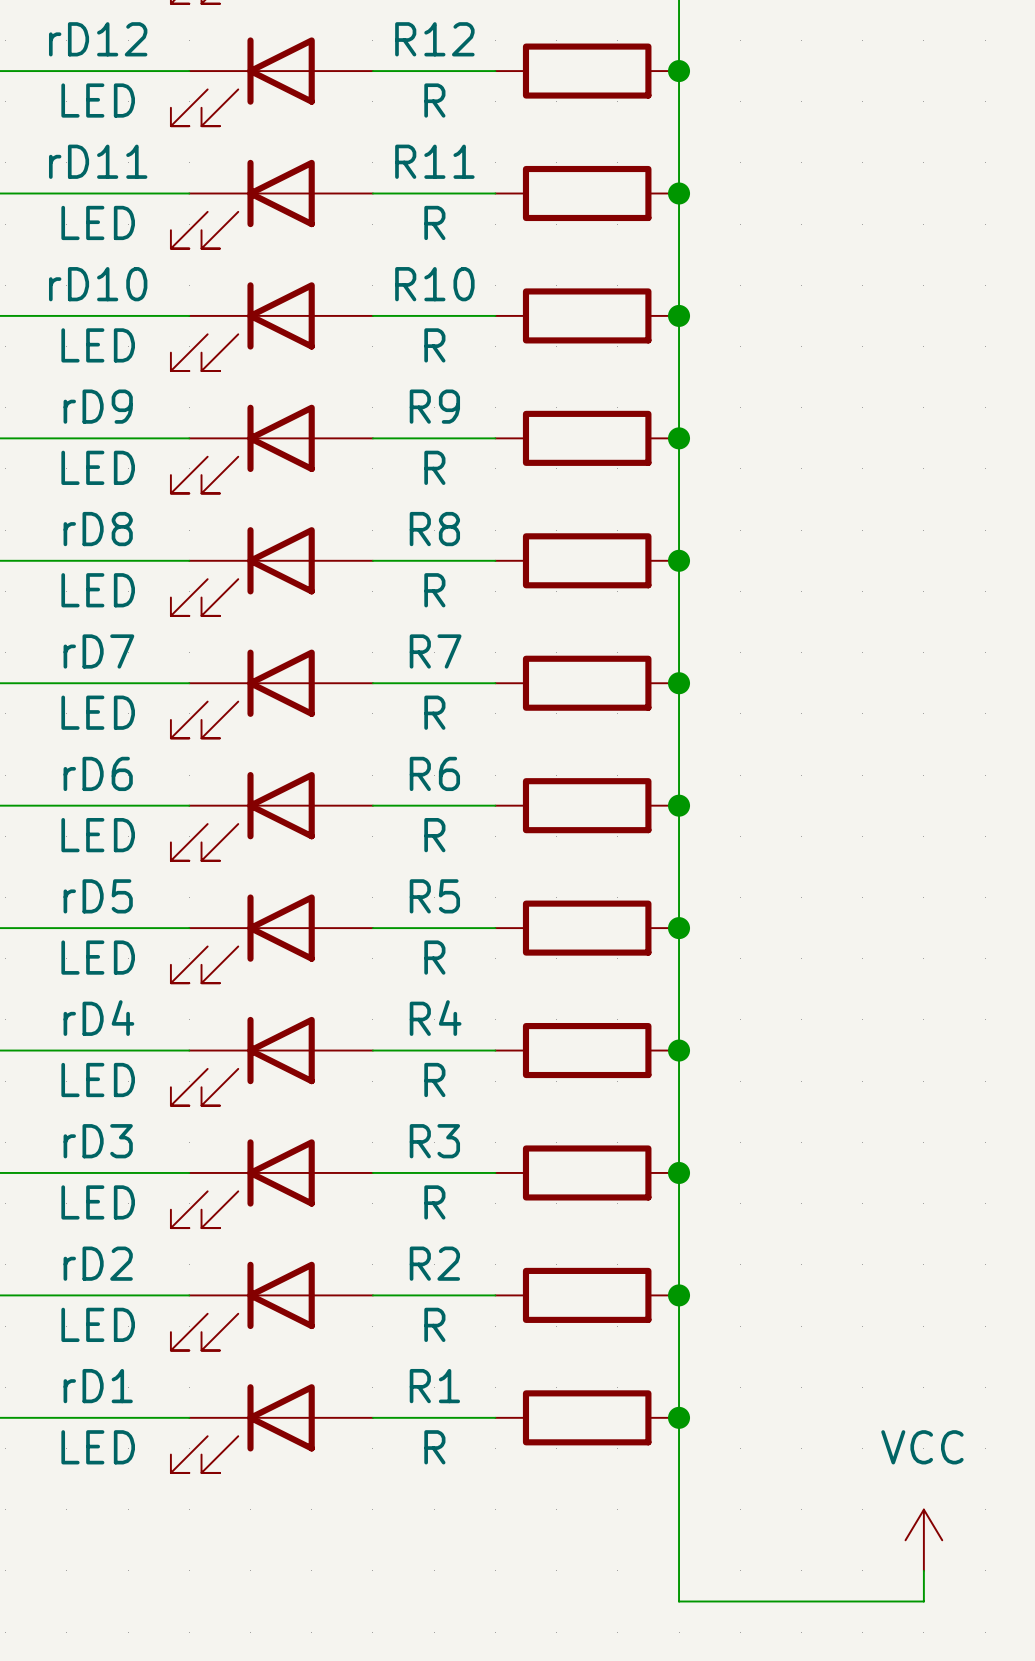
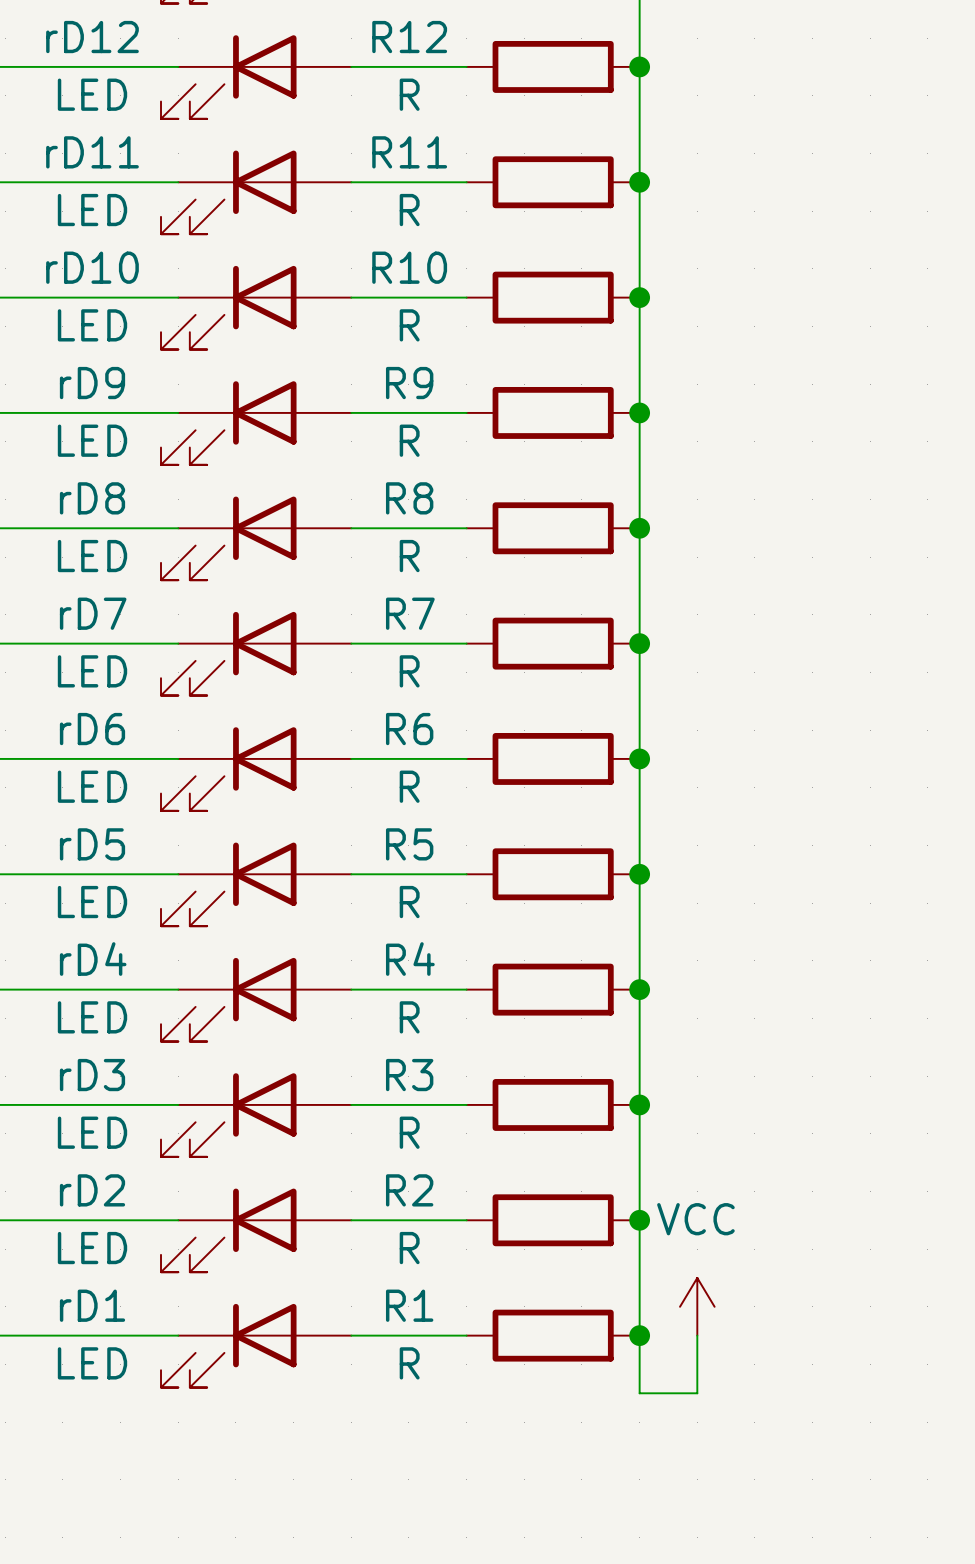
wire: (679, 1479) (679, 1601) (923, 1601) (923, 1570) -> (639, 1393) (697, 1393) (697, 1335)
power symbol position: VCC (923, 1540) -> VCC (697, 1306)

